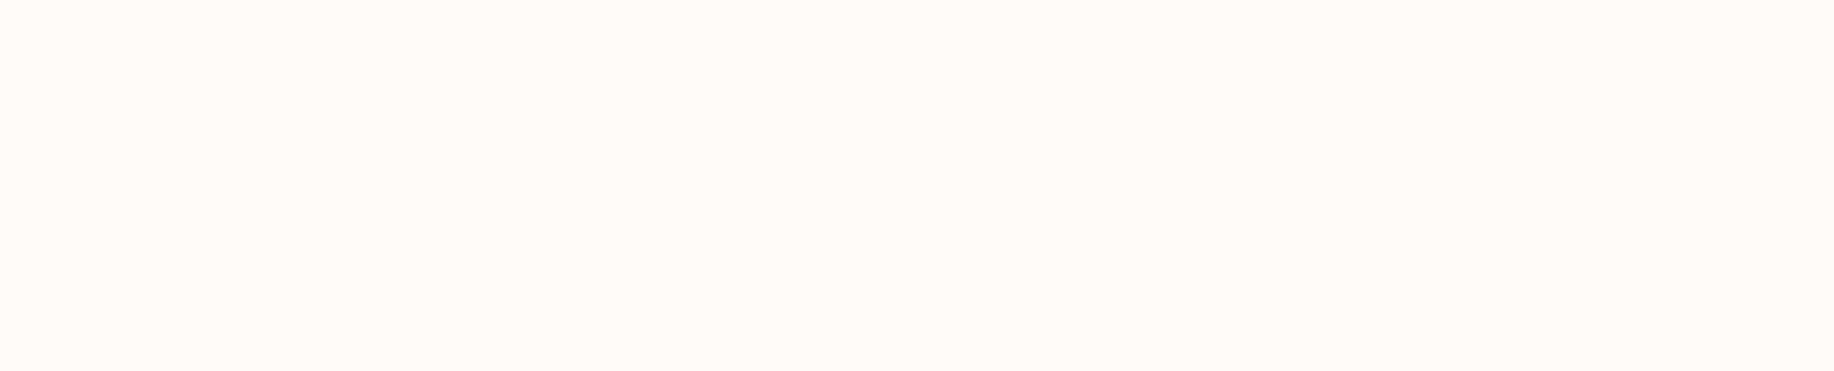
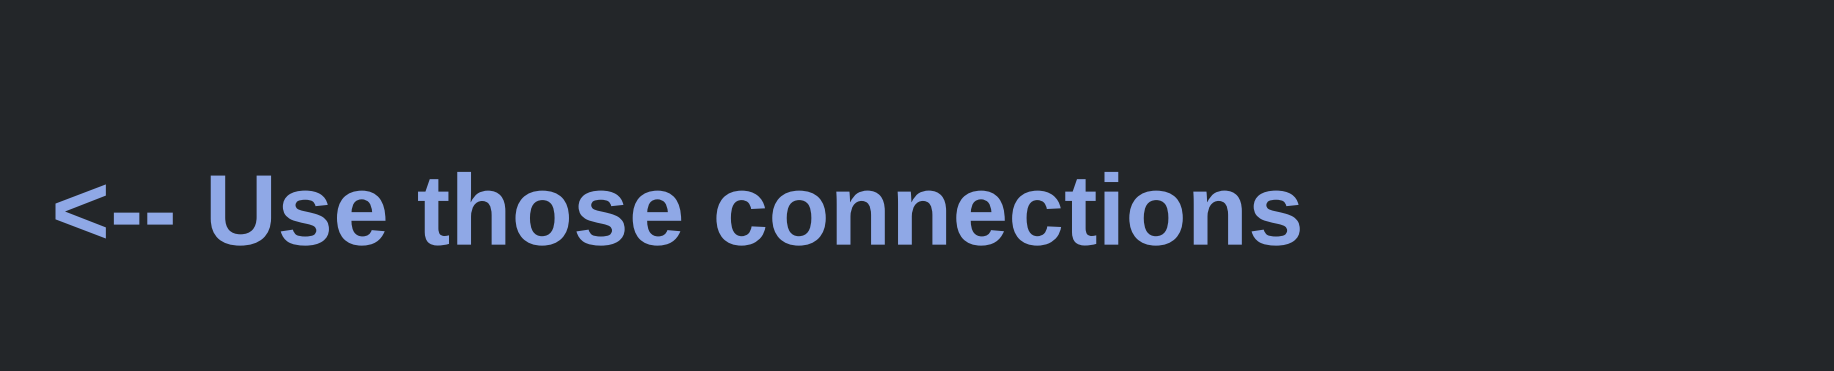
text: none -> <-- Use those connections (677, 208)

